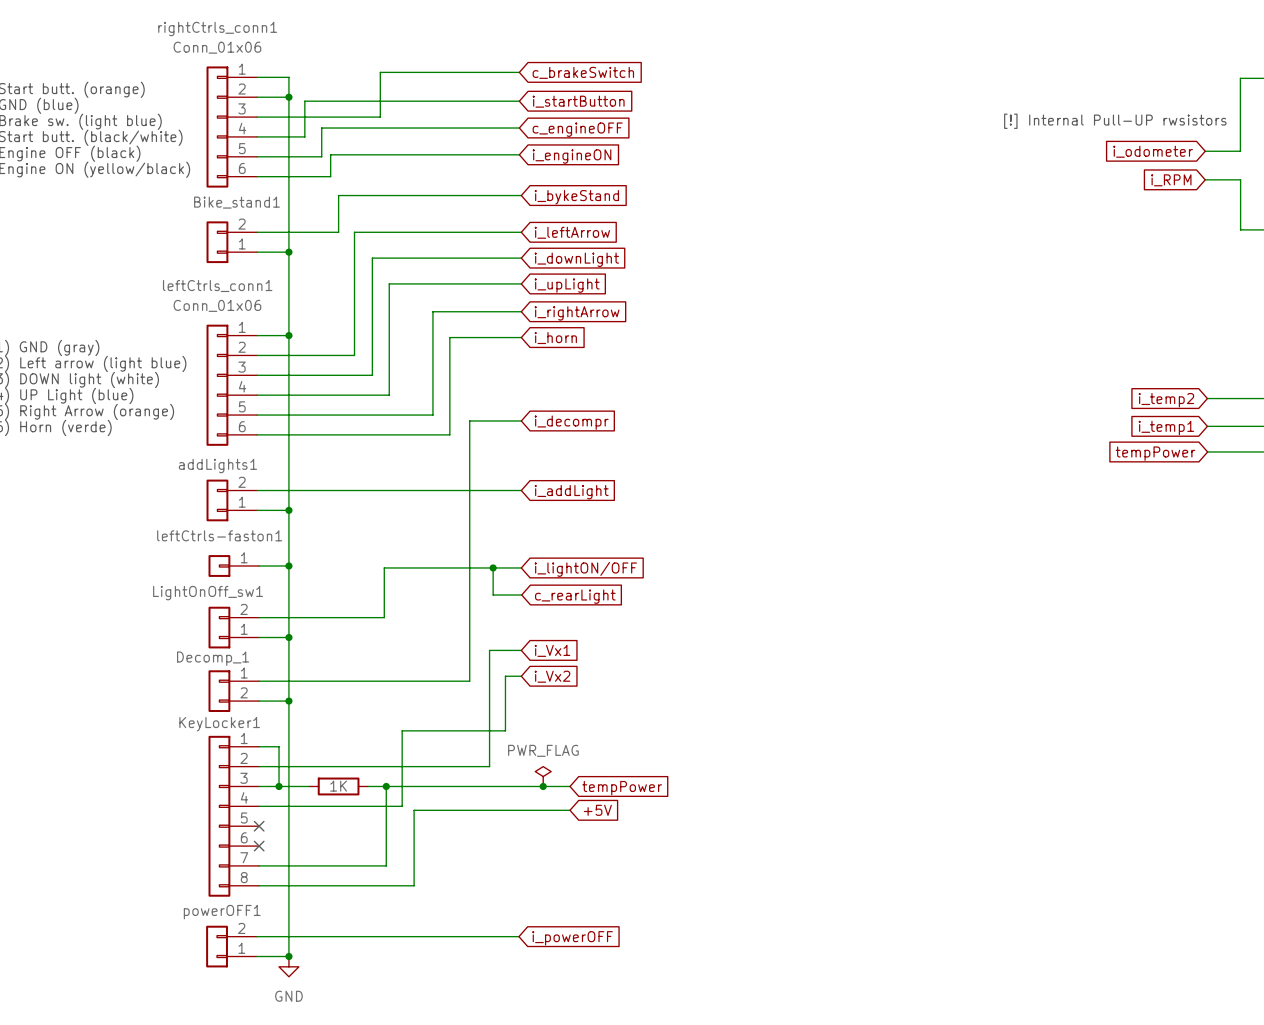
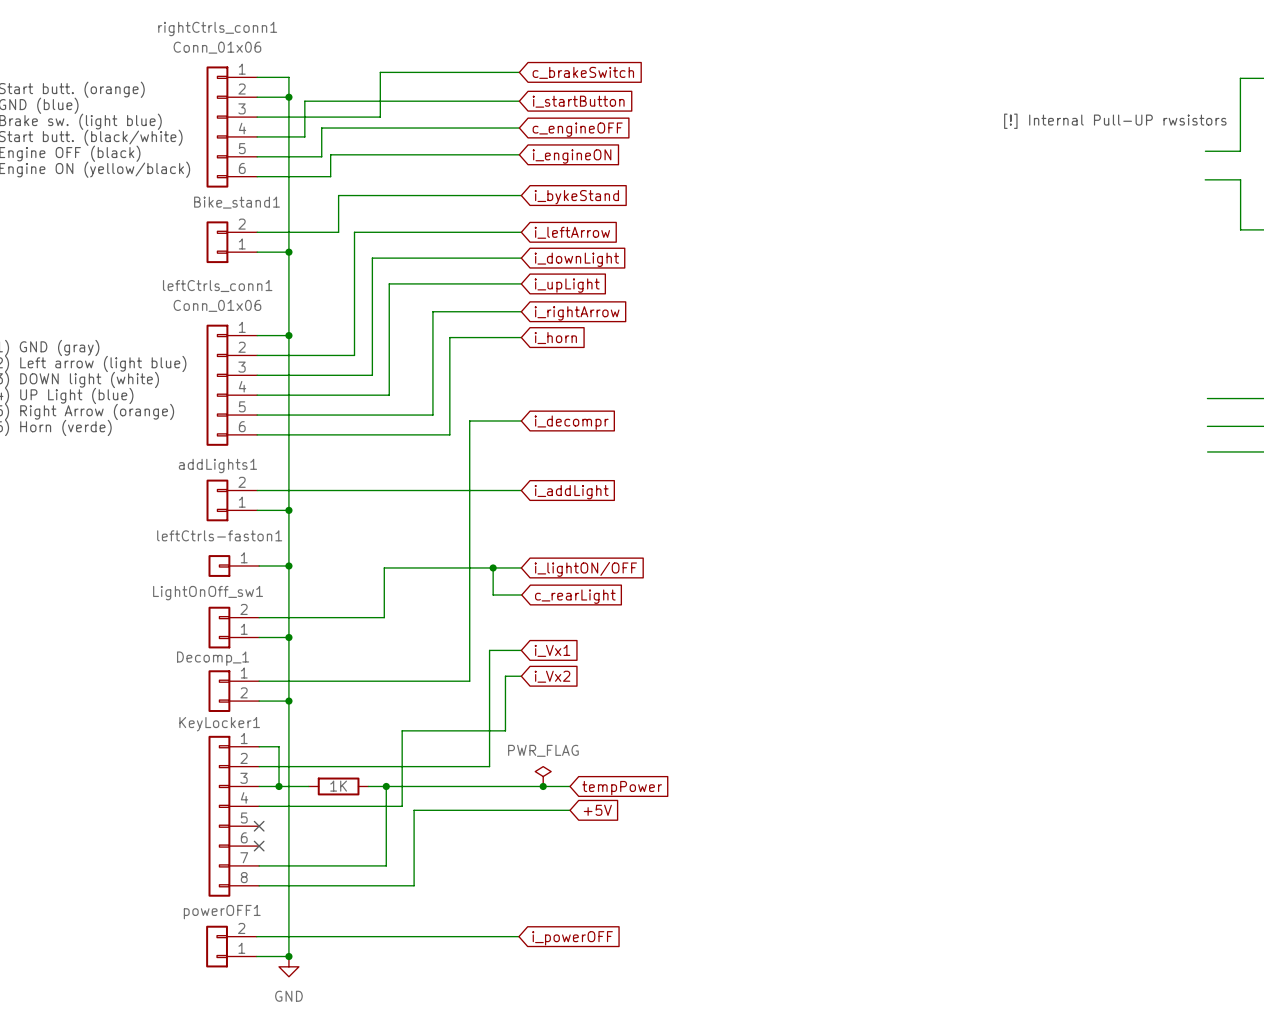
global label: i_odometer (1153, 151) -> none
global label: i_RPM (1171, 180) -> none
global label: i_temp2 (1166, 400) -> none
global label: i_temp1 (1166, 428) -> none
global label: tempPower (1155, 453) -> none

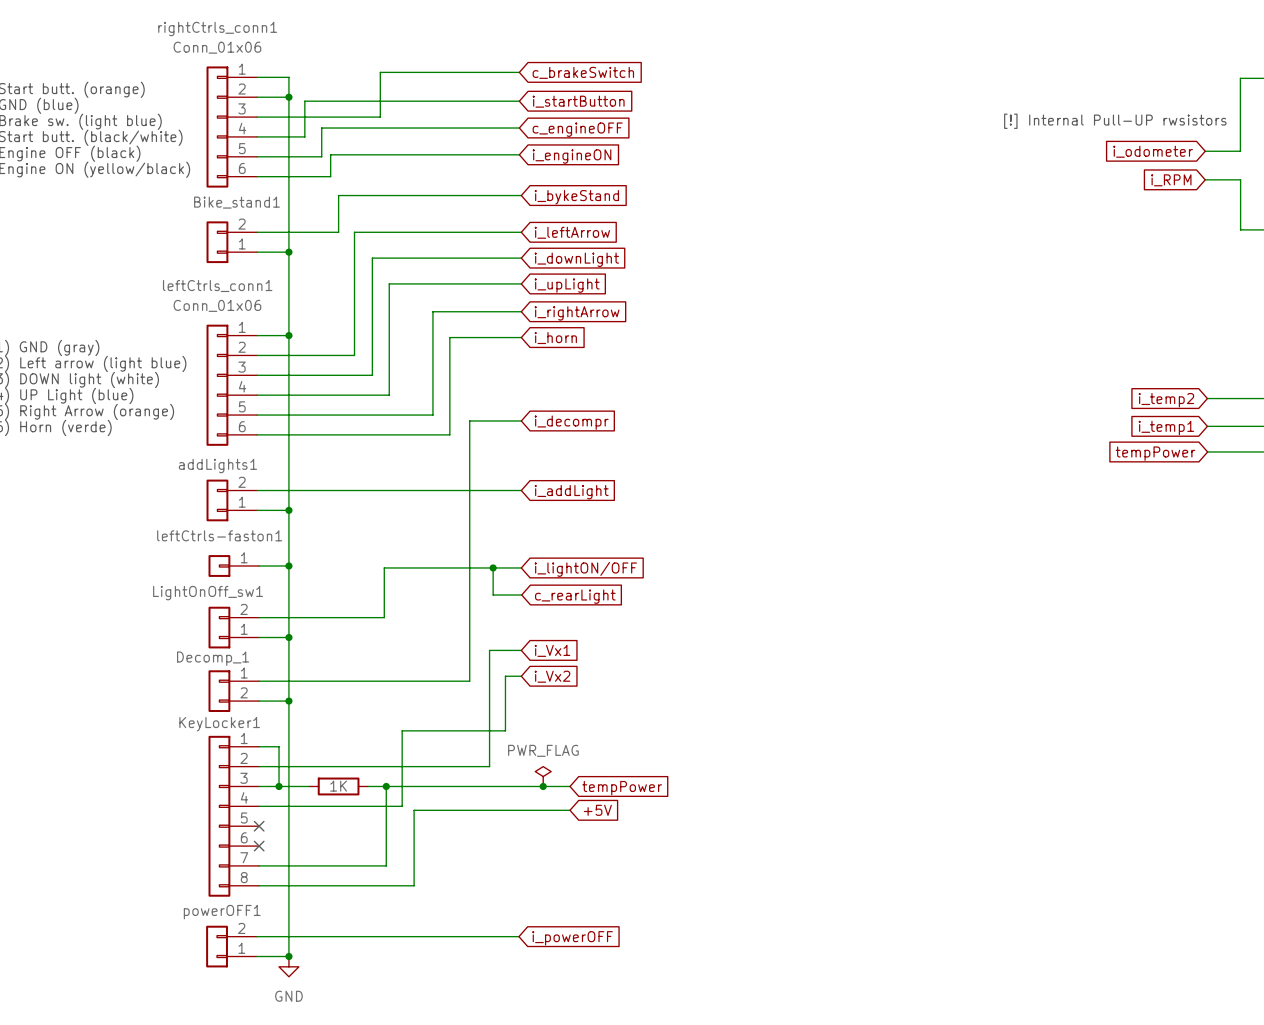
global label: none -> i_odometer (1153, 151)
global label: none -> i_RPM (1171, 180)
global label: none -> i_temp2 (1166, 400)
global label: none -> i_temp1 (1166, 428)
global label: none -> tempPower (1155, 453)

